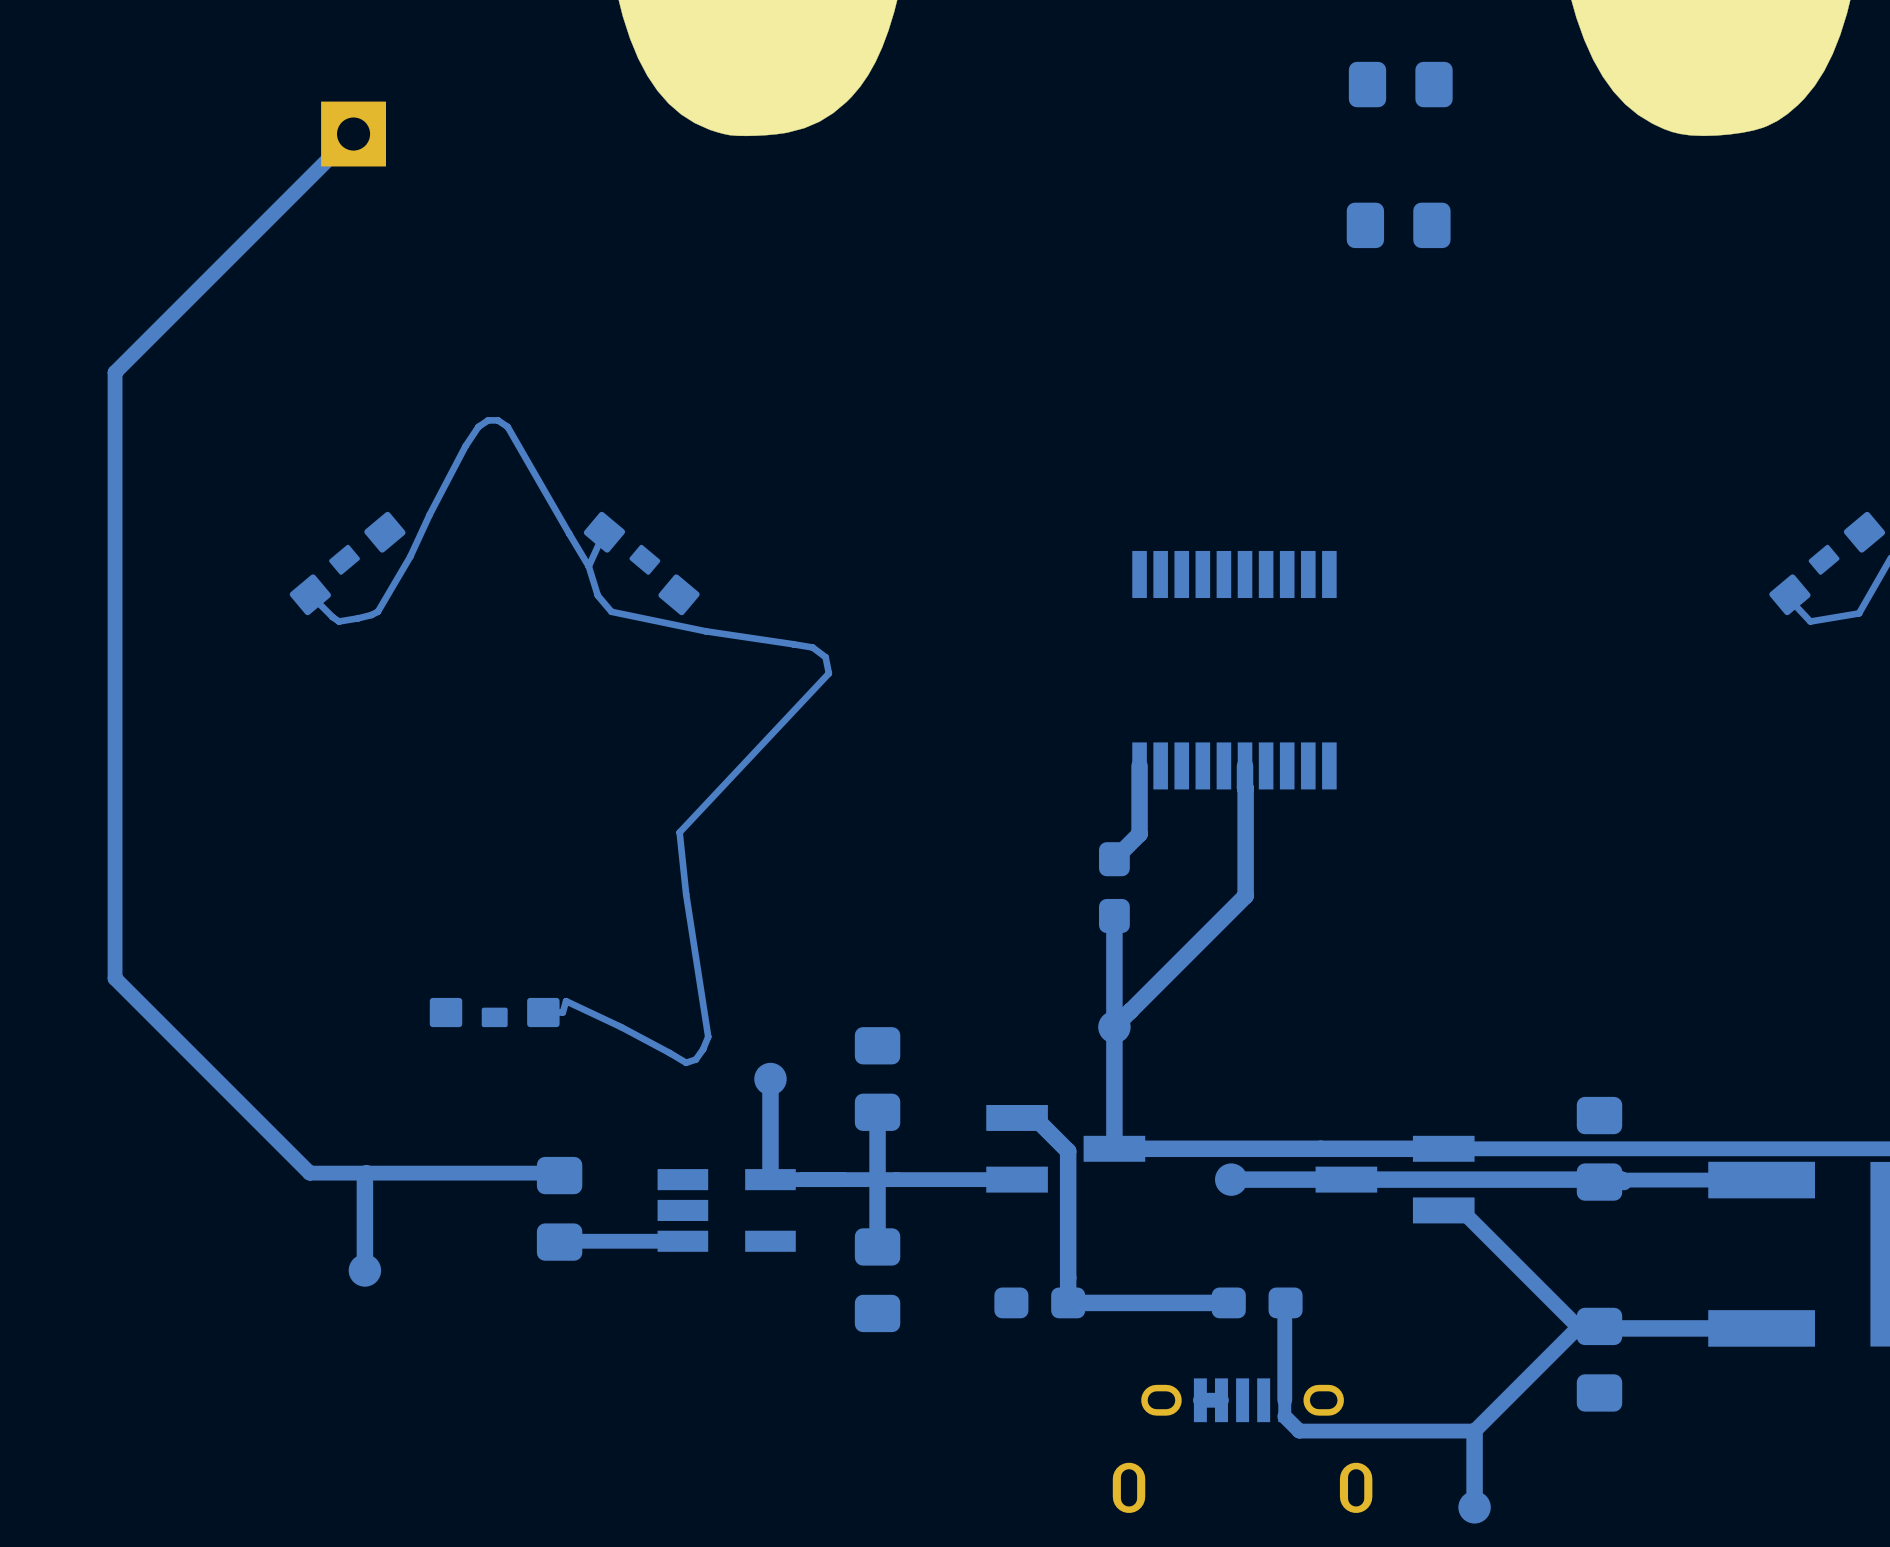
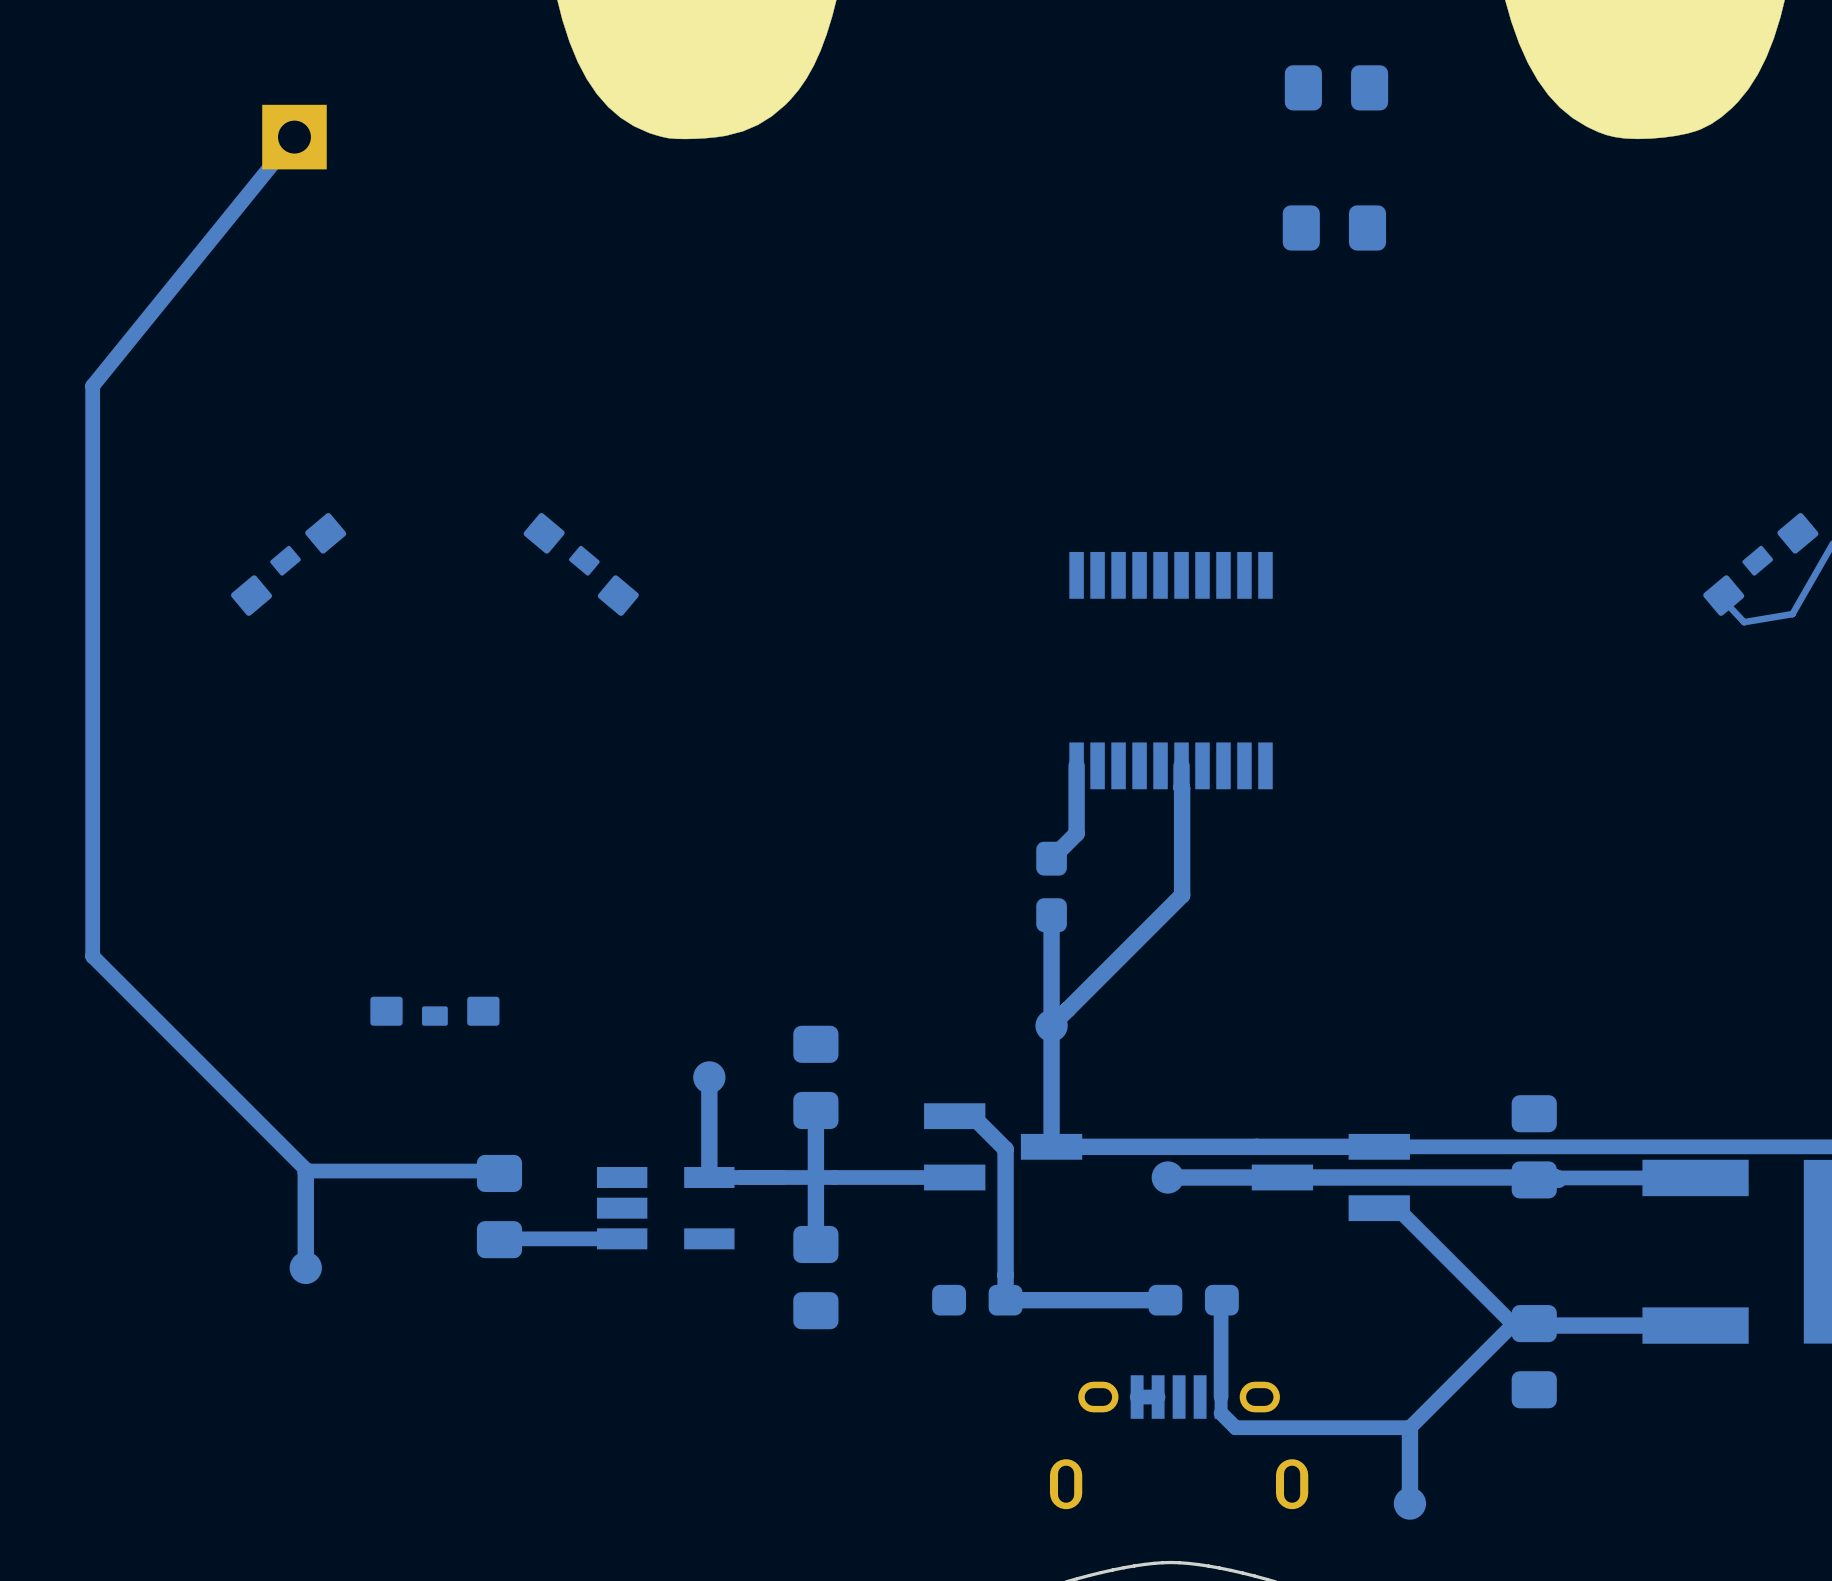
bottom track: (353, 134) (115, 372) (115, 978) (309, 1173) (366, 1173) -> (294, 137) (92, 385) (92, 956) (307, 1171)
bottom track: (604, 532) (605, 530) (588, 566) -> none
bottom track: (588, 566) (507, 426) (497, 420) (488, 420) (478, 426) (465, 446) (410, 556) (377, 611) (371, 615) (338, 621) (310, 594) -> none
bottom track: (588, 566) (597, 595) (611, 611) (705, 631) (812, 647) (825, 657) (828, 673) (679, 832) (686, 894) (708, 1036) (703, 1049) (695, 1059) (686, 1062) (621, 1027) (566, 1001) (562, 1012) (543, 1012) -> none

